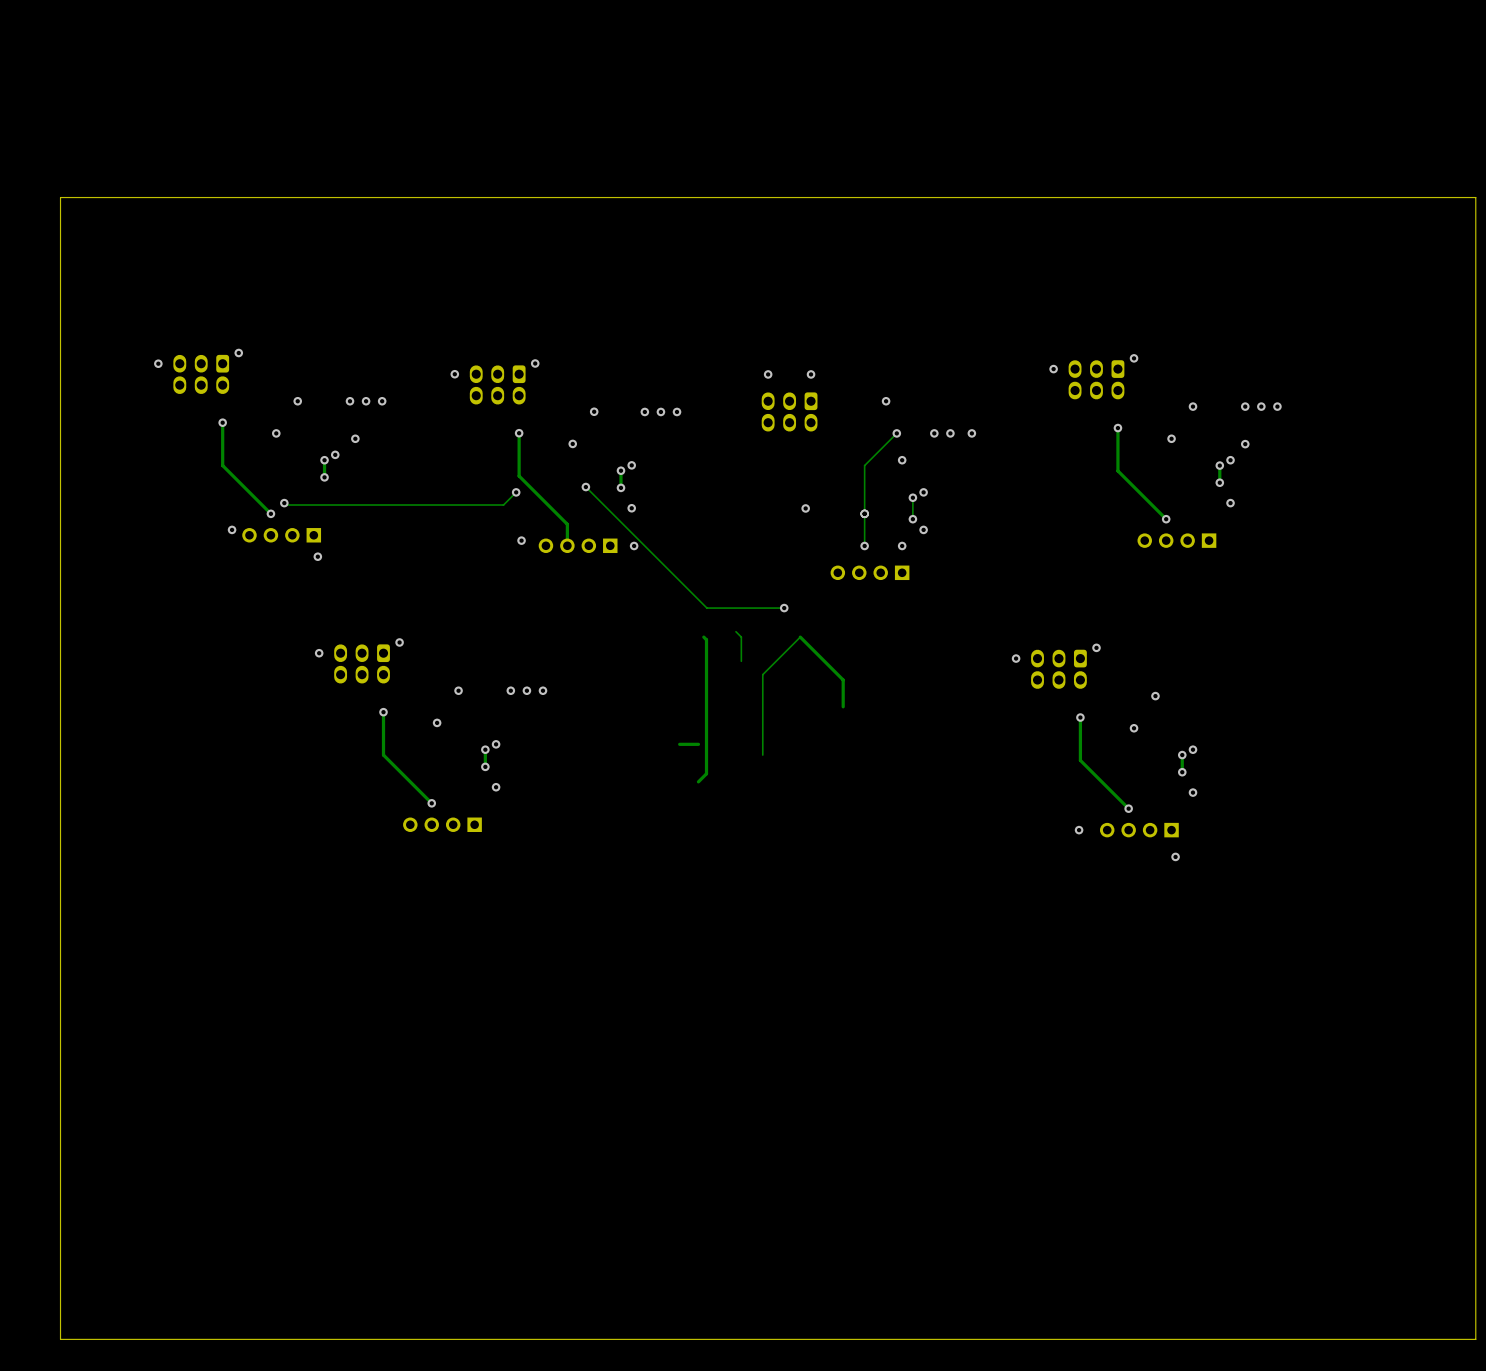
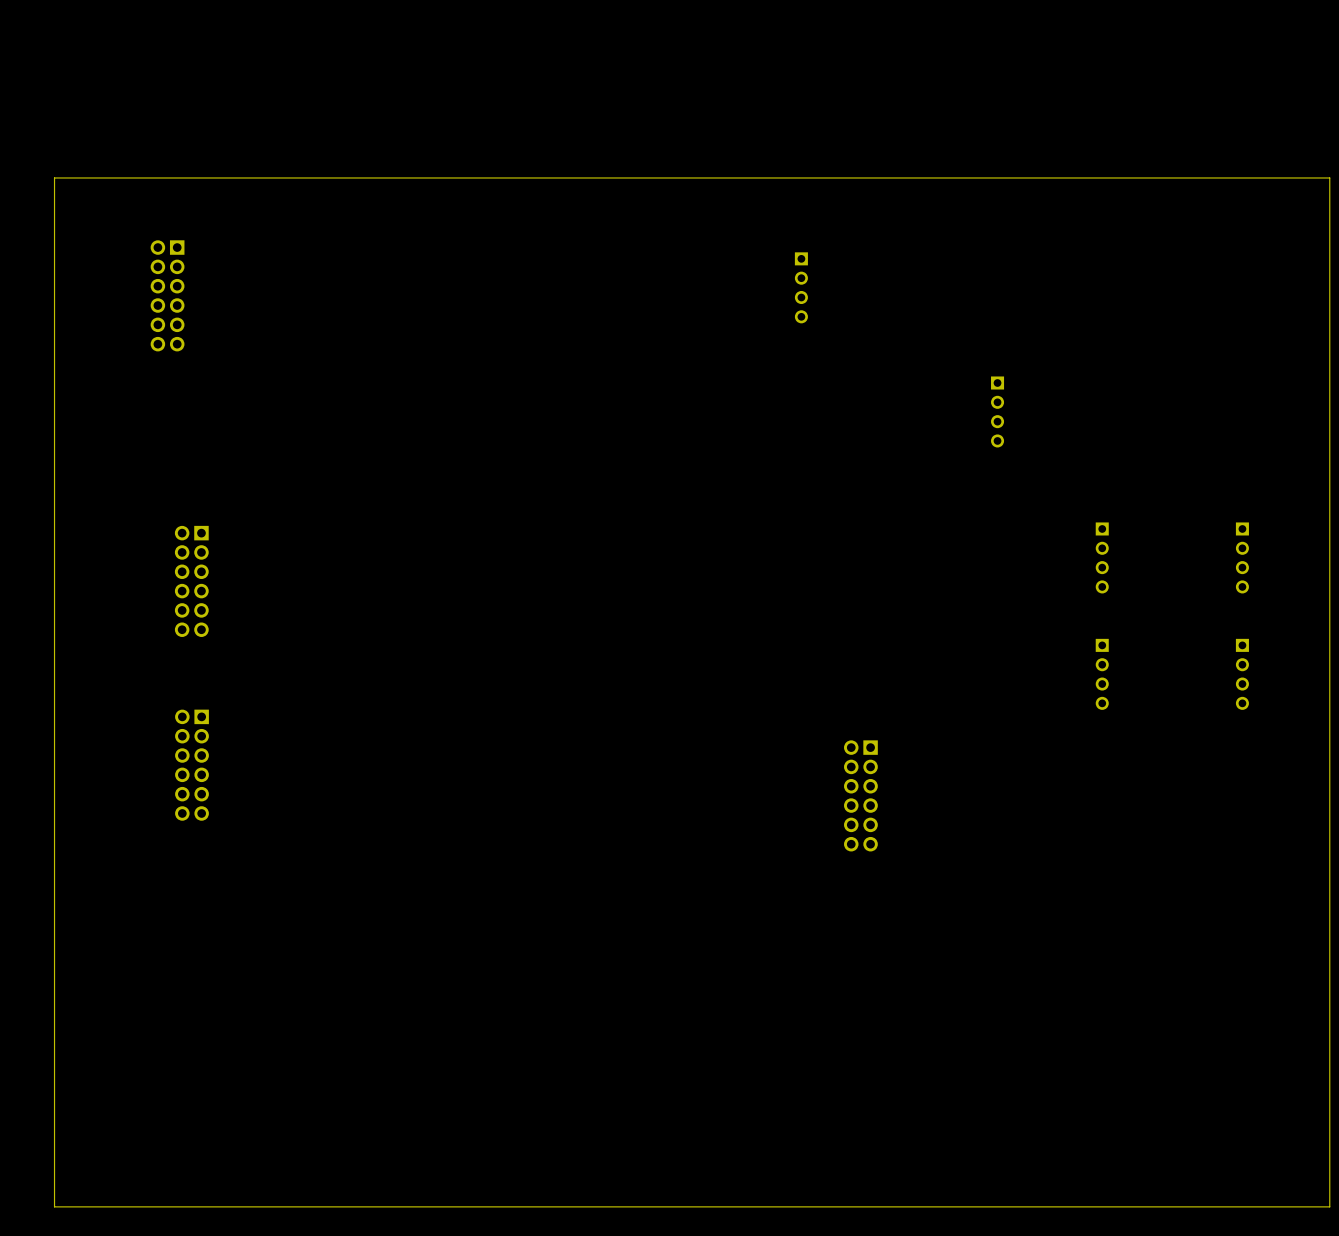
part: none -> (801, 287)
part: none -> (167, 295)
via: (238, 353) -> none
via: (1134, 358) -> none
via: (158, 363) -> none
via: (535, 363) -> none
via: (1053, 369) -> none
part: (201, 374) -> none
via: (454, 374) -> none
via: (768, 374) -> none
via: (811, 374) -> none
part: (1096, 379) -> none
part: (497, 384) -> none
via: (297, 401) -> none
via: (350, 401) -> none
via: (366, 401) -> none
via: (382, 401) -> none
via: (886, 401) -> none
via: (1192, 406) -> none
via: (1245, 406) -> none
via: (1261, 406) -> none
via: (1277, 406) -> none
via: (594, 411) -> none
via: (644, 411) -> none
via: (660, 411) -> none
via: (677, 411) -> none
part: (789, 411) -> none
track: (222, 422) (222, 465) (270, 513) -> none
via: (222, 422) -> none
track: (1117, 428) (1117, 470) (1166, 519) -> none
via: (1117, 428) -> none
via: (276, 433) -> none
track: (519, 433) (519, 476) (567, 524) (567, 545) -> none
via: (519, 433) -> none
track: (896, 433) (864, 465) (864, 545) -> none
via: (896, 433) -> none
via: (934, 433) -> none
via: (950, 433) -> none
via: (971, 433) -> none
via: (355, 438) -> none
via: (1171, 438) -> none
via: (572, 443) -> none
via: (1245, 444) -> none
via: (335, 454) -> none
part: none -> (997, 411)
track: (324, 460) (324, 477) -> none
via: (324, 460) -> none
via: (902, 460) -> none
via: (1230, 460) -> none
via: (631, 465) -> none
track: (1219, 465) (1219, 482) -> none
via: (1219, 465) -> none
track: (620, 470) (620, 487) -> none
via: (620, 470) -> none
via: (324, 477) -> none
via: (1219, 482) -> none
track: (585, 487) (706, 608) (784, 608) -> none
via: (585, 487) -> none
via: (620, 487) -> none
track: (516, 492) (503, 505) (286, 505) (284, 503) -> none
via: (516, 492) -> none
via: (923, 492) -> none
track: (912, 497) (912, 519) -> none
via: (912, 497) -> none
via: (284, 503) -> none
via: (1230, 503) -> none
via: (631, 508) -> none
via: (805, 508) -> none
via: (270, 513) -> none
via: (864, 513) -> none
via: (912, 519) -> none
via: (1166, 519) -> none
via: (232, 529) -> none
via: (923, 529) -> none
part: (281, 535) -> none
via: (521, 540) -> none
part: (1176, 540) -> none
part: (578, 545) -> none
via: (634, 545) -> none
via: (864, 545) -> none
via: (902, 545) -> none
via: (317, 556) -> none
part: (870, 572) -> none
via: (784, 608) -> none
part: none -> (1102, 557)
part: none -> (1242, 557)
track: (735, 631) (741, 637) (741, 661) -> none
track: (703, 637) (706, 639) (706, 773) (698, 781) -> none
via: (399, 642) -> none
part: none -> (191, 581)
via: (1096, 647) -> none
via: (319, 653) -> none
via: (1016, 658) -> none
part: (362, 663) -> none
part: (1058, 669) -> none
via: (458, 690) -> none
via: (510, 690) -> none
via: (526, 690) -> none
via: (542, 690) -> none
via: (1155, 696) -> none
track: (843, 706) (843, 680) (800, 637) (762, 674) (762, 755) -> none
track: (383, 712) (383, 755) (431, 803) -> none
via: (383, 712) -> none
track: (1080, 717) (1080, 760) (1128, 808) -> none
via: (1080, 717) -> none
via: (437, 722) -> none
via: (1134, 728) -> none
via: (496, 744) -> none
track: (698, 744) (679, 744) -> none
part: none -> (1102, 674)
part: none -> (1242, 674)
track: (485, 749) (485, 766) -> none
via: (485, 749) -> none
via: (1192, 749) -> none
track: (1182, 755) (1182, 772) -> none
via: (1182, 755) -> none
via: (485, 766) -> none
via: (1182, 772) -> none
via: (496, 787) -> none
via: (1192, 792) -> none
via: (431, 803) -> none
via: (1128, 808) -> none
part: (442, 824) -> none
via: (1079, 830) -> none
part: (1139, 830) -> none
part: none -> (192, 765)
via: (1175, 856) -> none
part: none -> (860, 795)

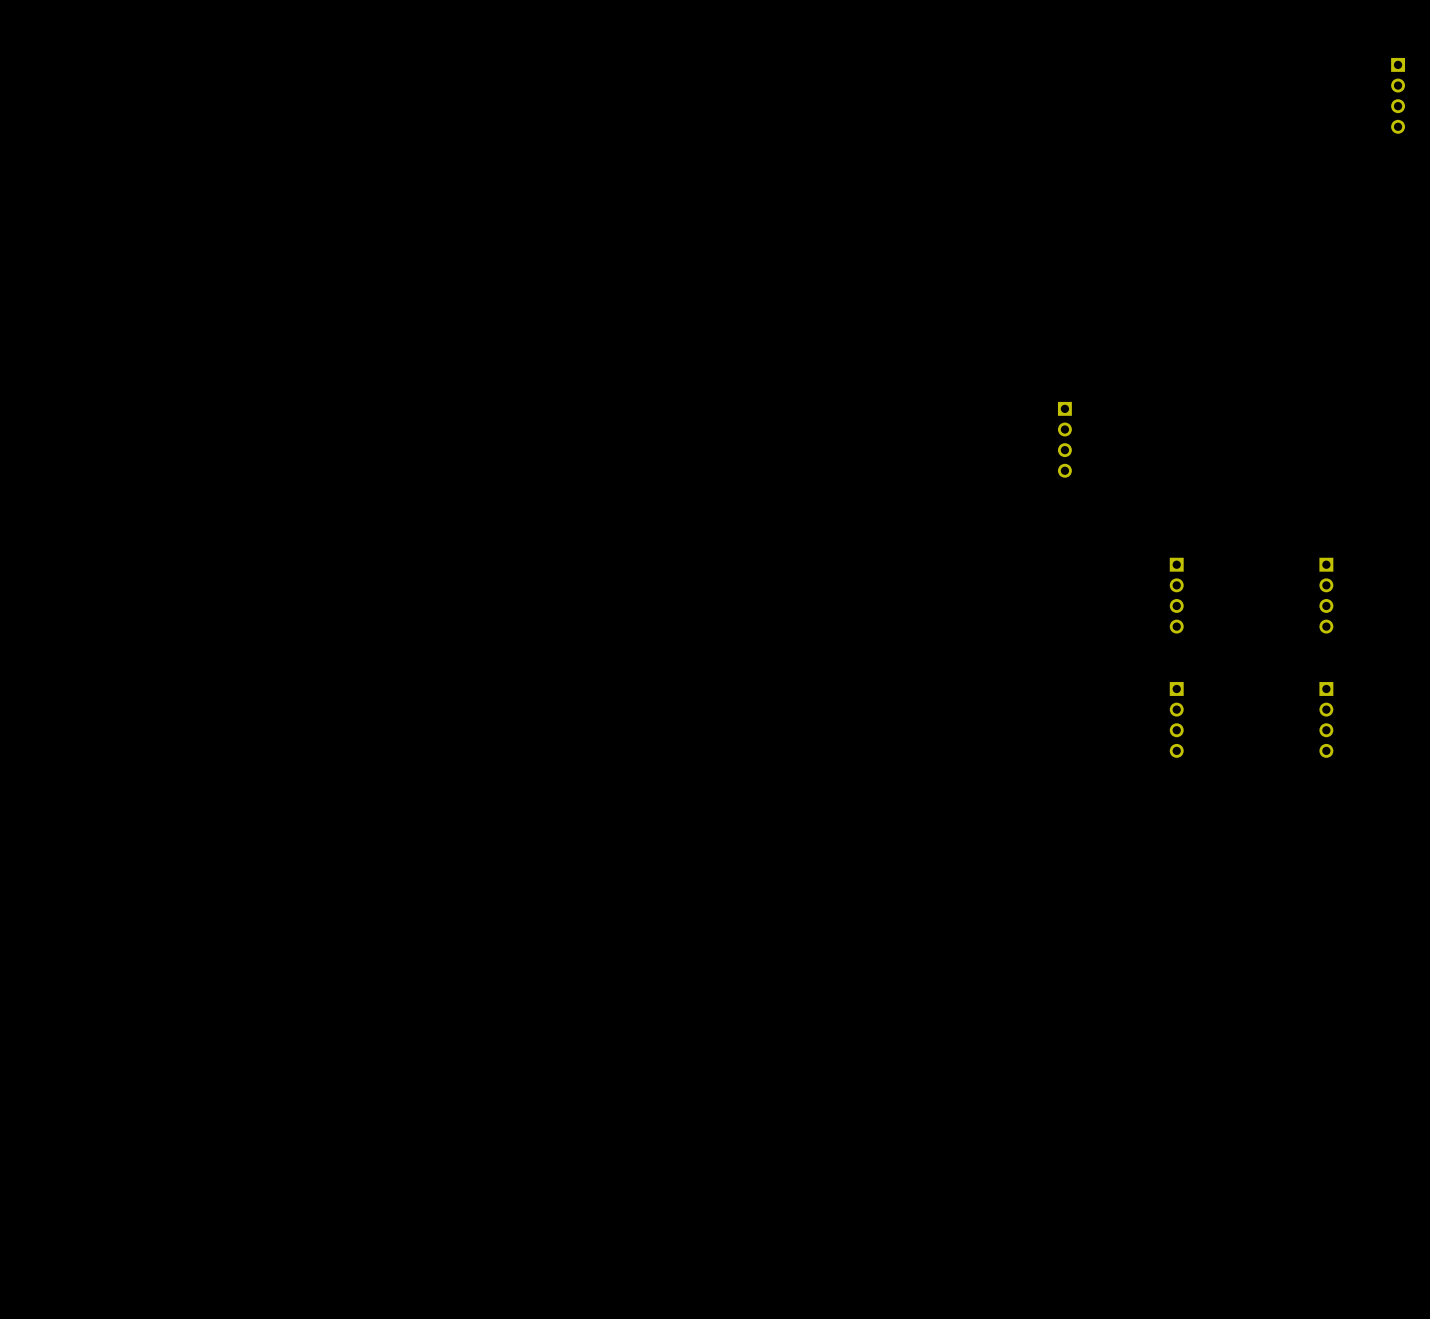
part: none -> (1398, 95)
board edge: (1329, 177) (54, 177) (54, 1206) (1329, 1206) (1329, 177) -> none
part: (801, 287) -> none
part: (167, 295) -> none
part: (191, 581) -> none
part: (192, 765) -> none
part: (860, 795) -> none

